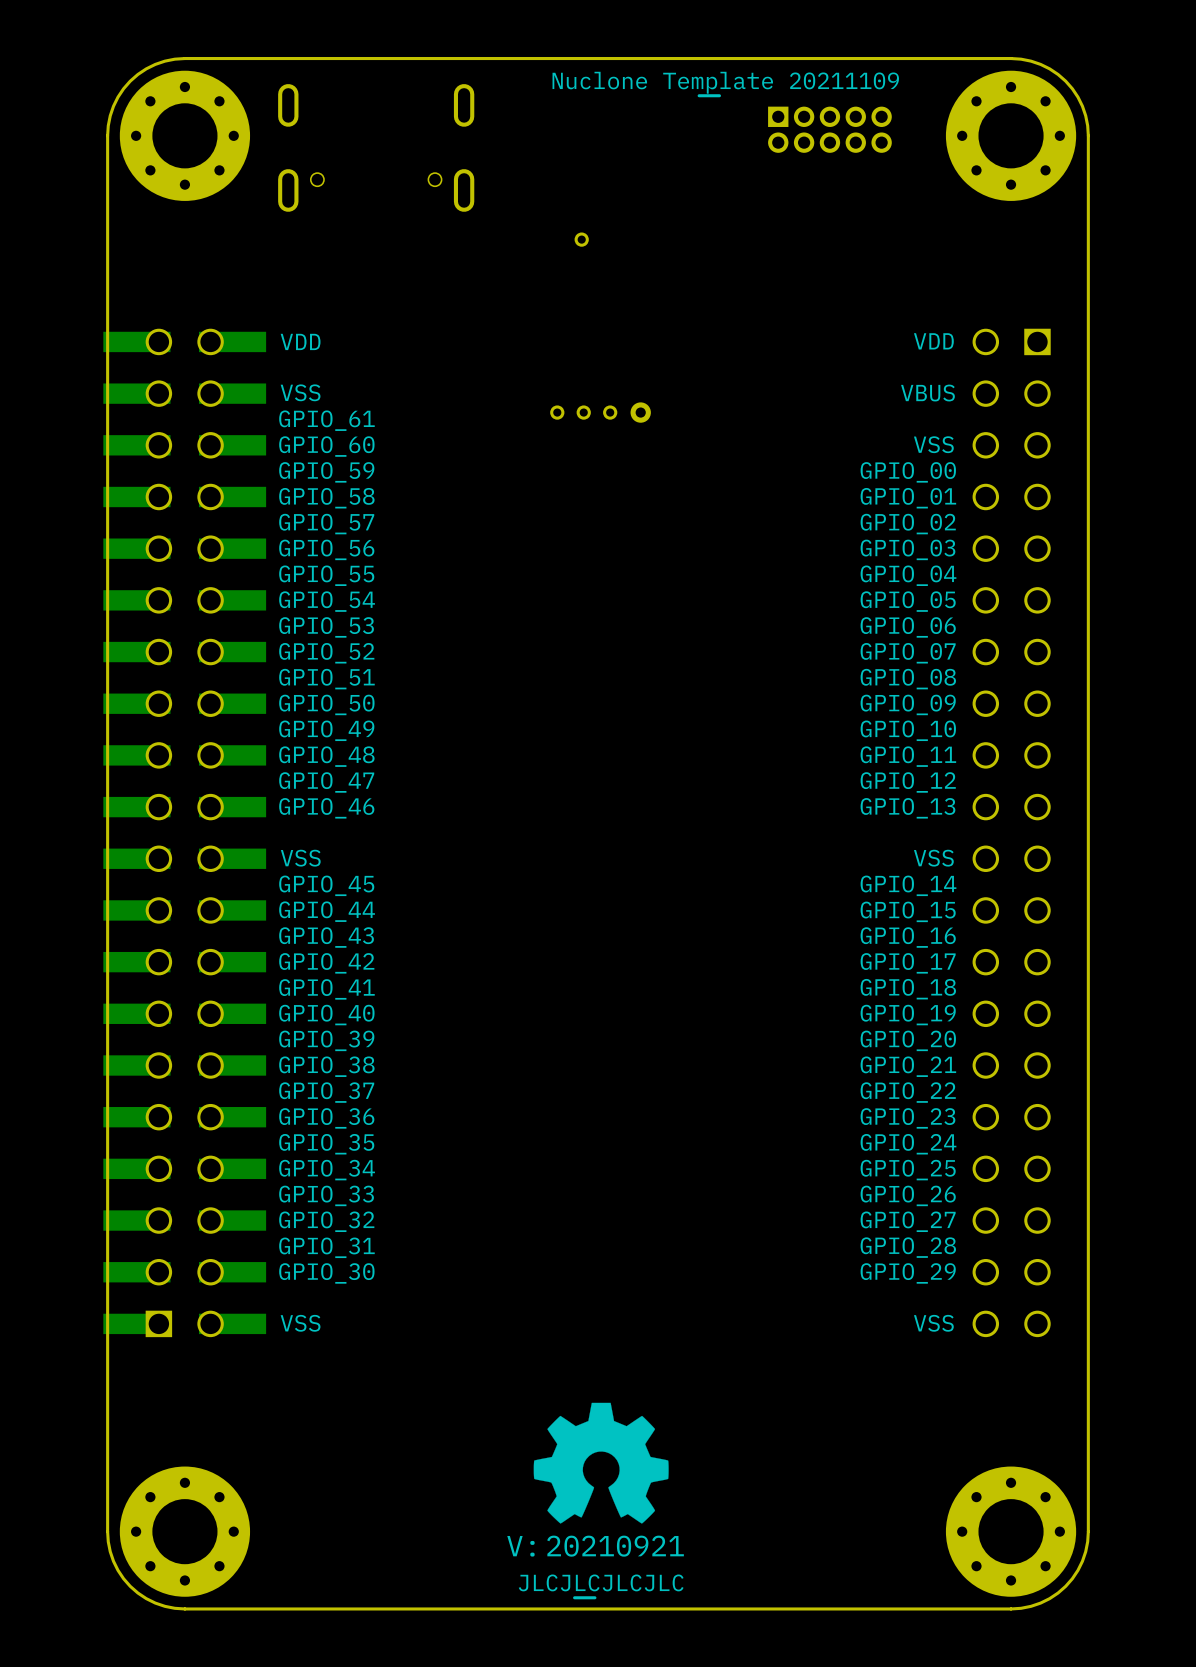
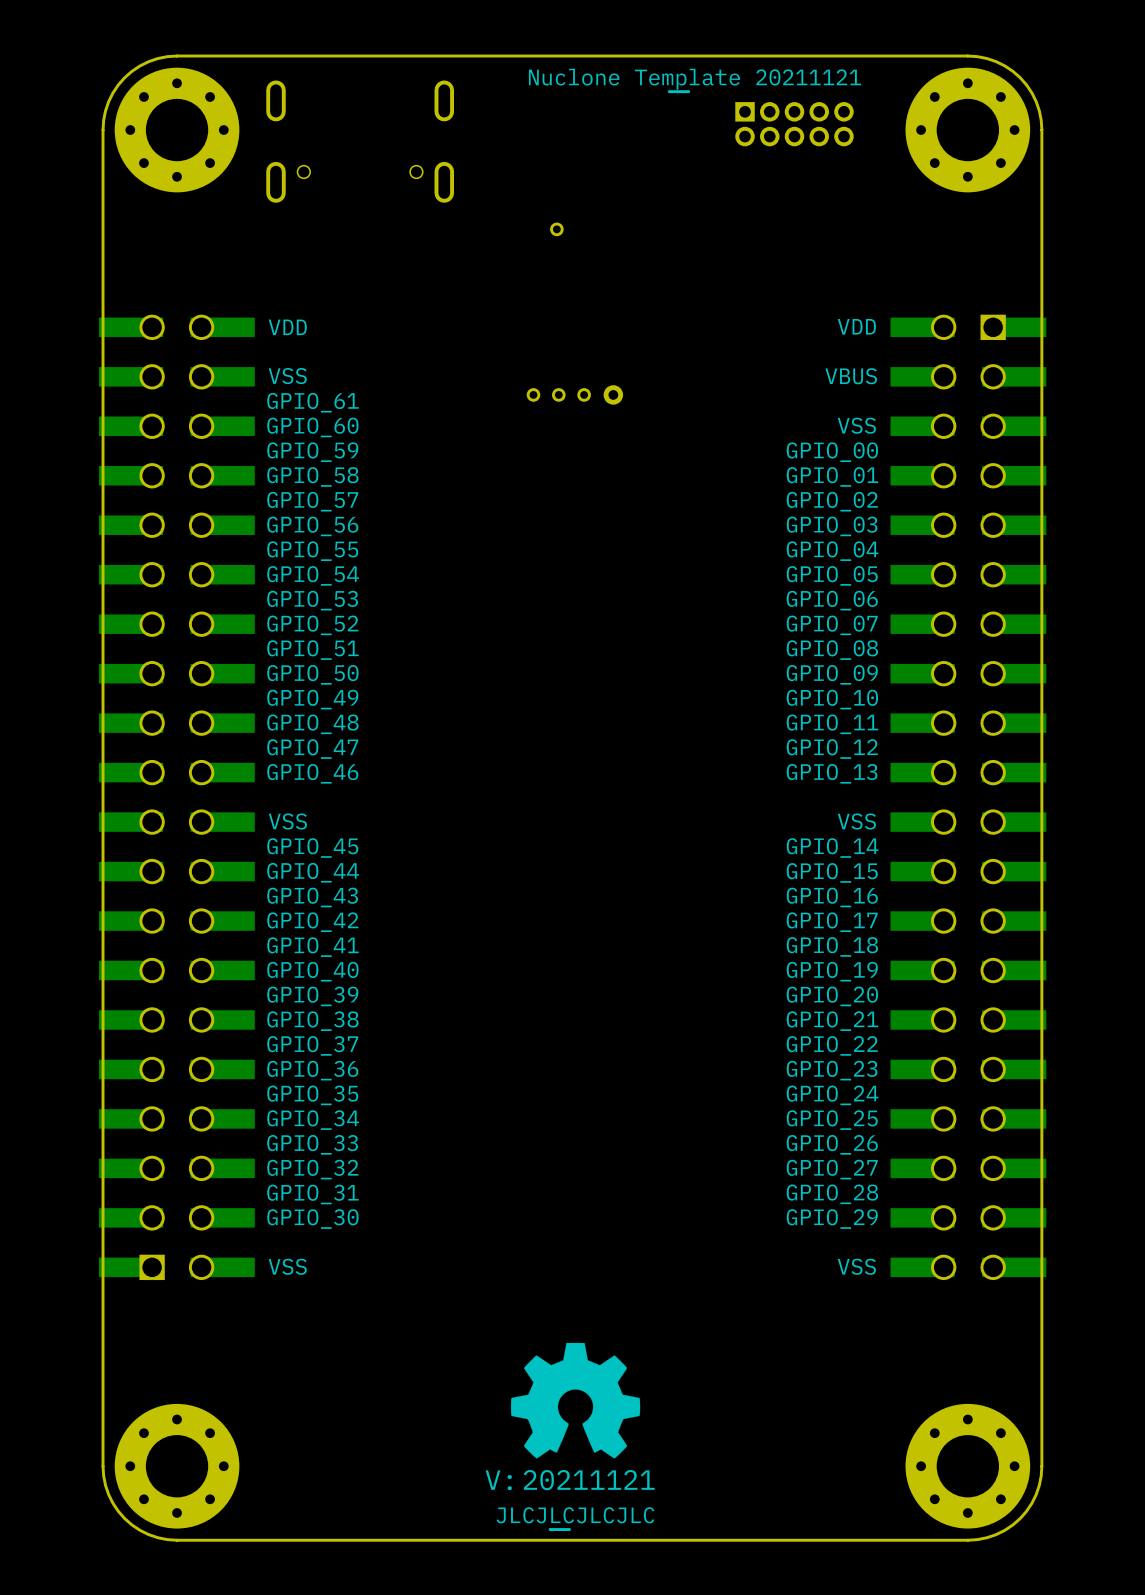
drawing shape: [552, 71, 900, 98] -> [528, 68, 861, 94]
part footprint: [972, 328, 1051, 1338] -> [890, 314, 1047, 1281]
drawing shape: [507, 1535, 684, 1557] -> [485, 1470, 655, 1491]

